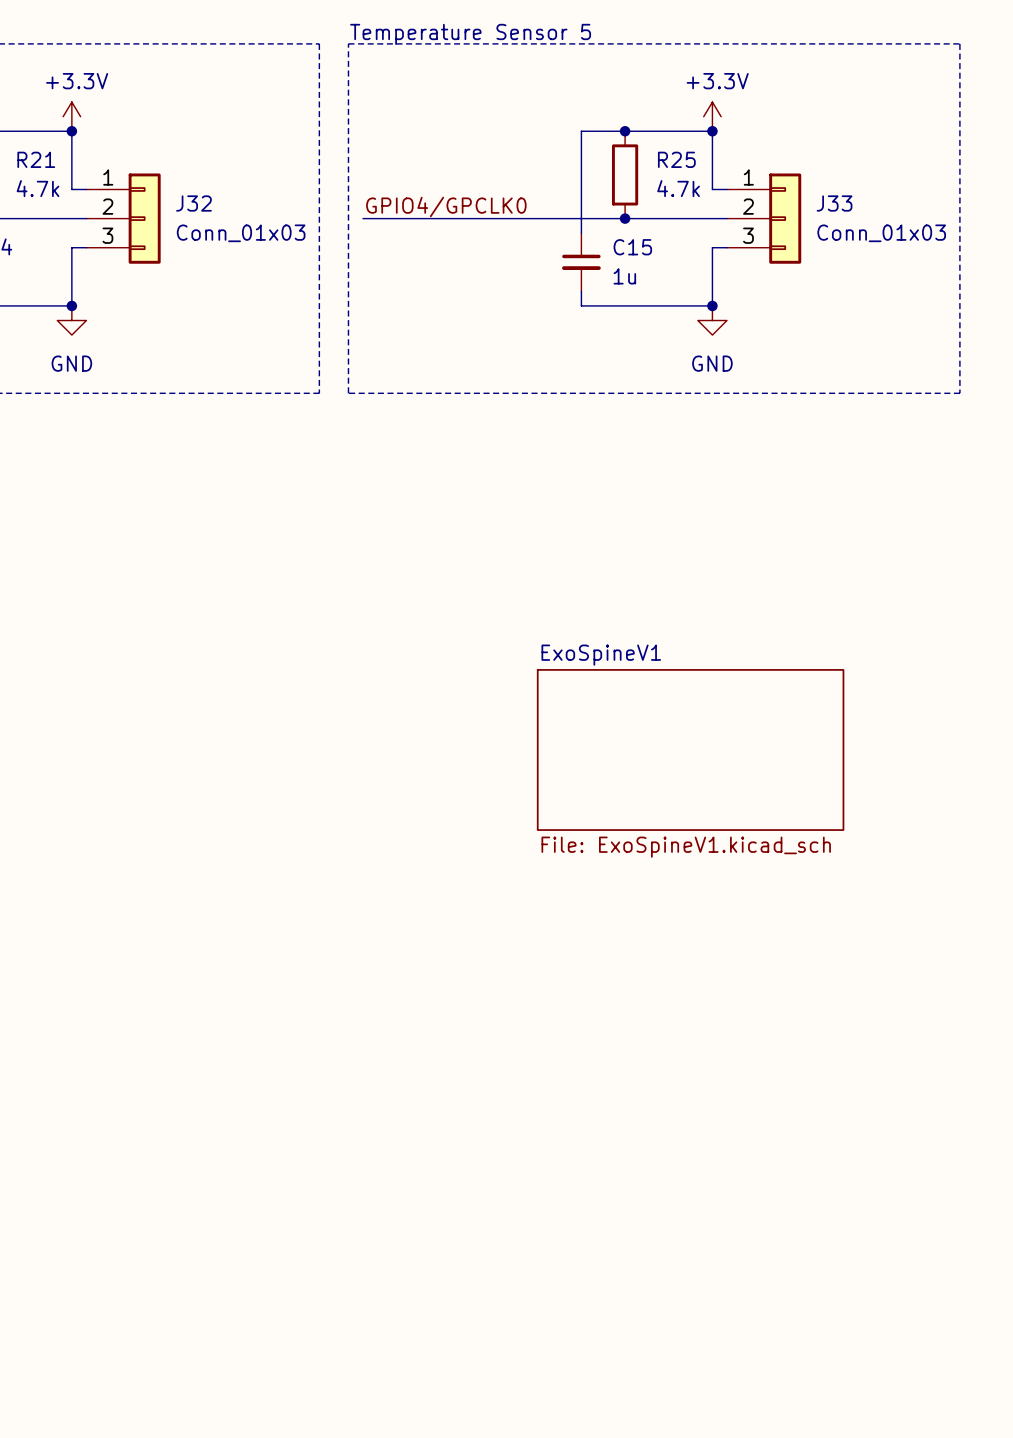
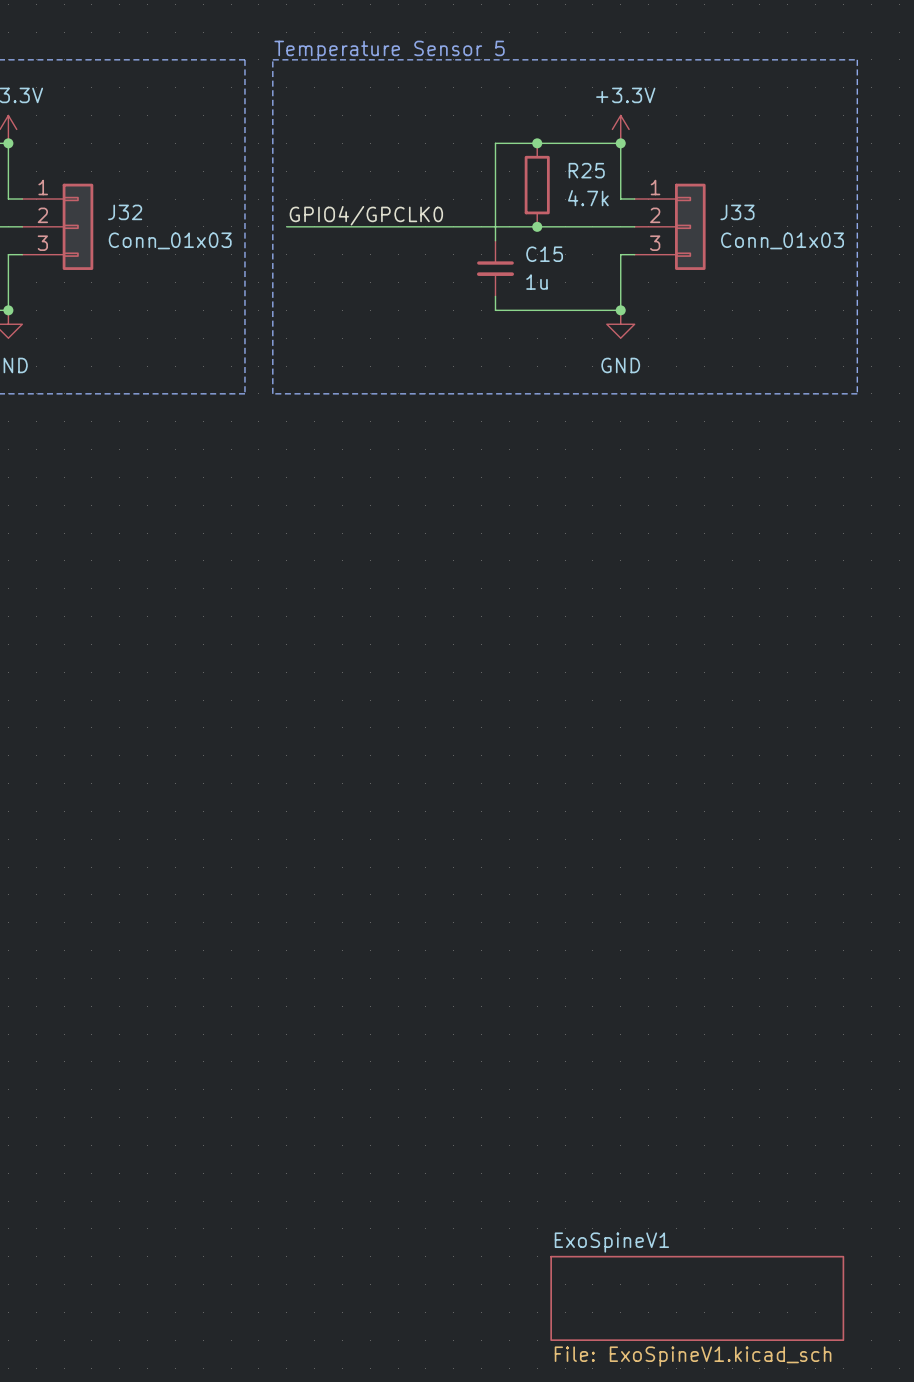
sheet ExoSpineV1 name position: ExoSpineV1 (601, 655) -> ExoSpineV1 (611, 1242)
sheet ExoSpineV1 shape: [536, 669, 845, 831] -> [550, 1255, 845, 1342]
sheet ExoSpineV1 value position: File: ExoSpineV1.kicad_sch (686, 847) -> File: ExoSpineV1.kicad_sch (693, 1356)

